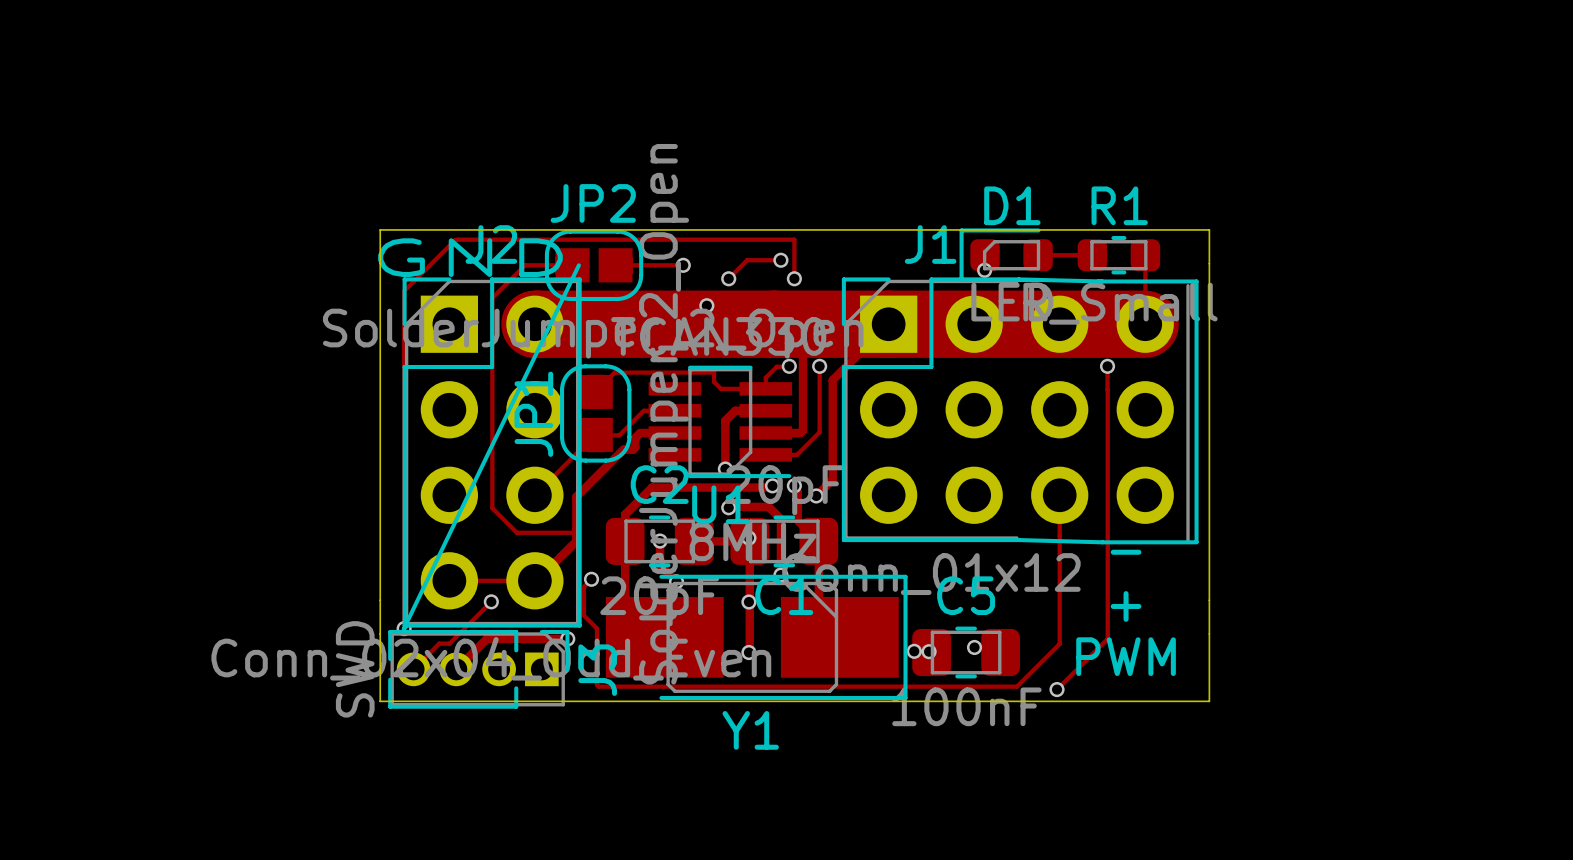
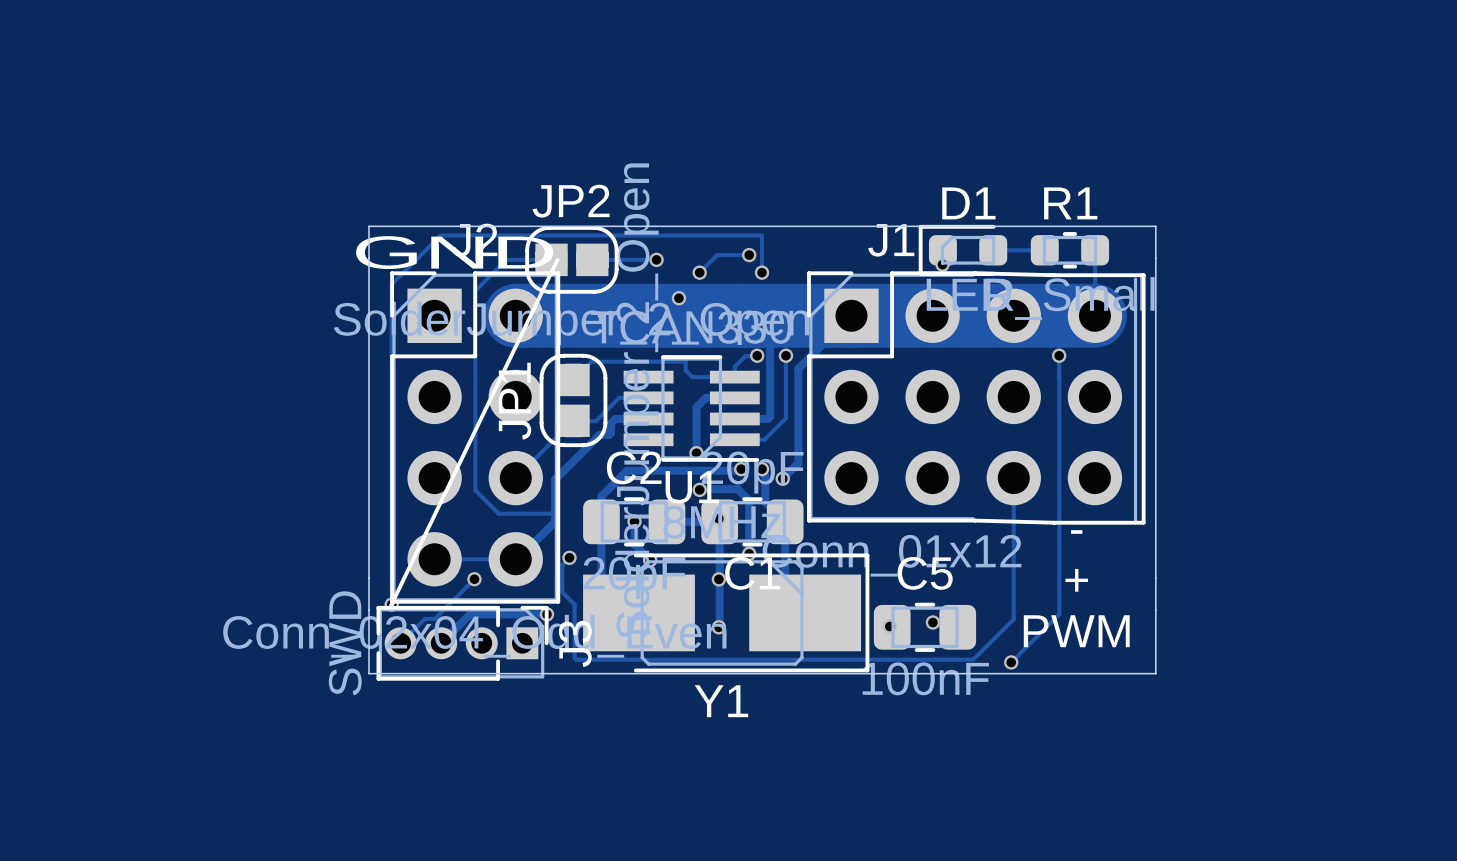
via: (914, 651) -> none

